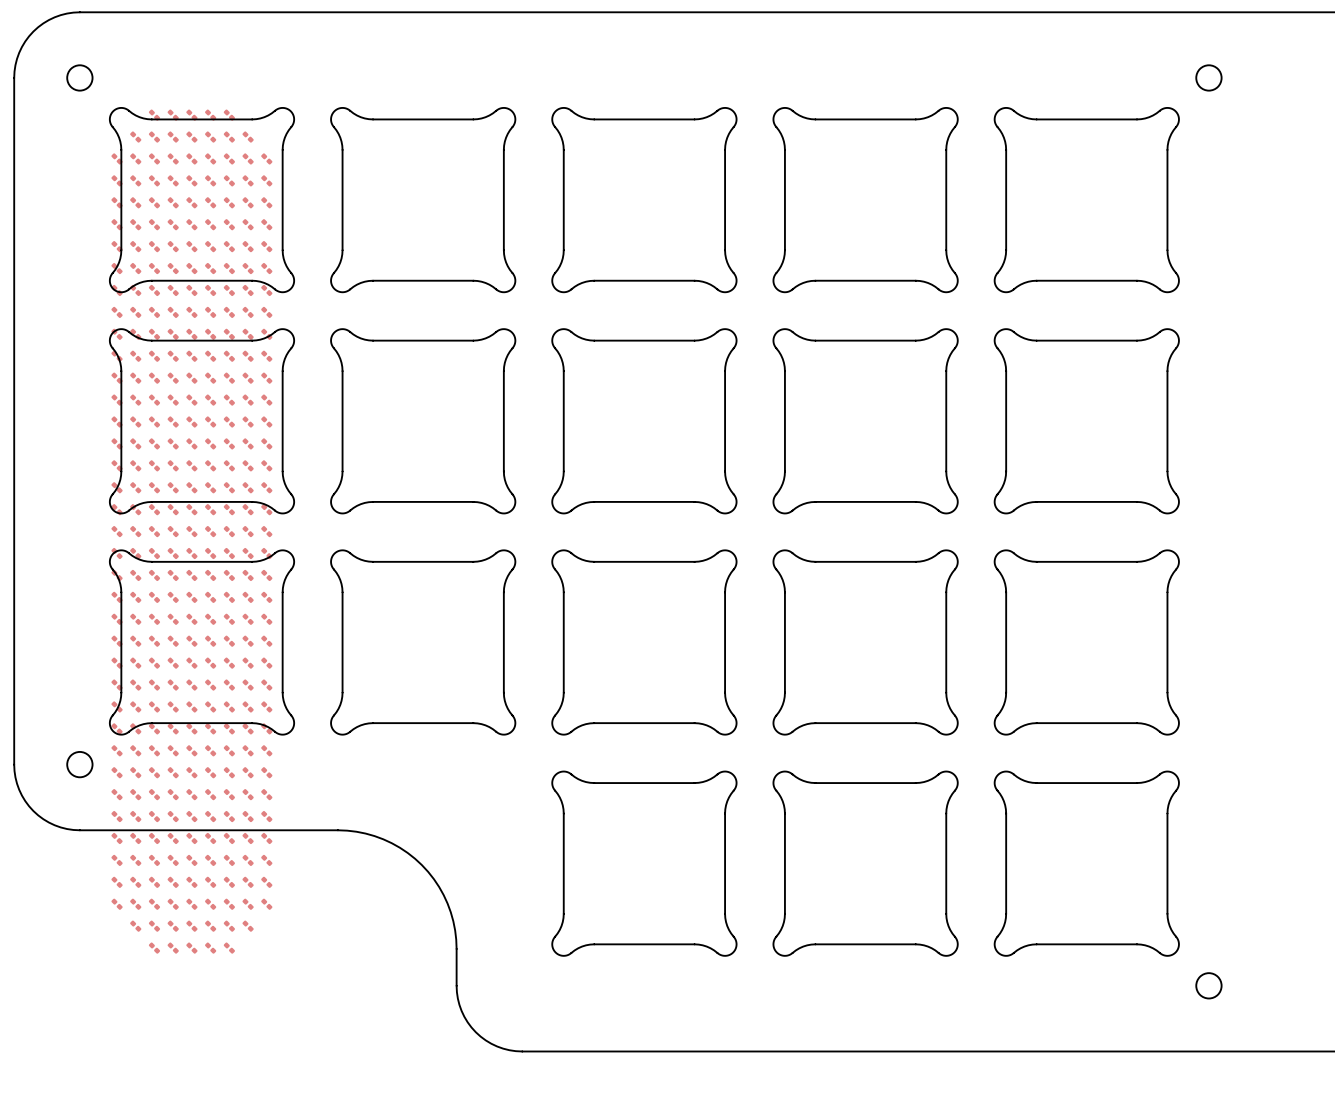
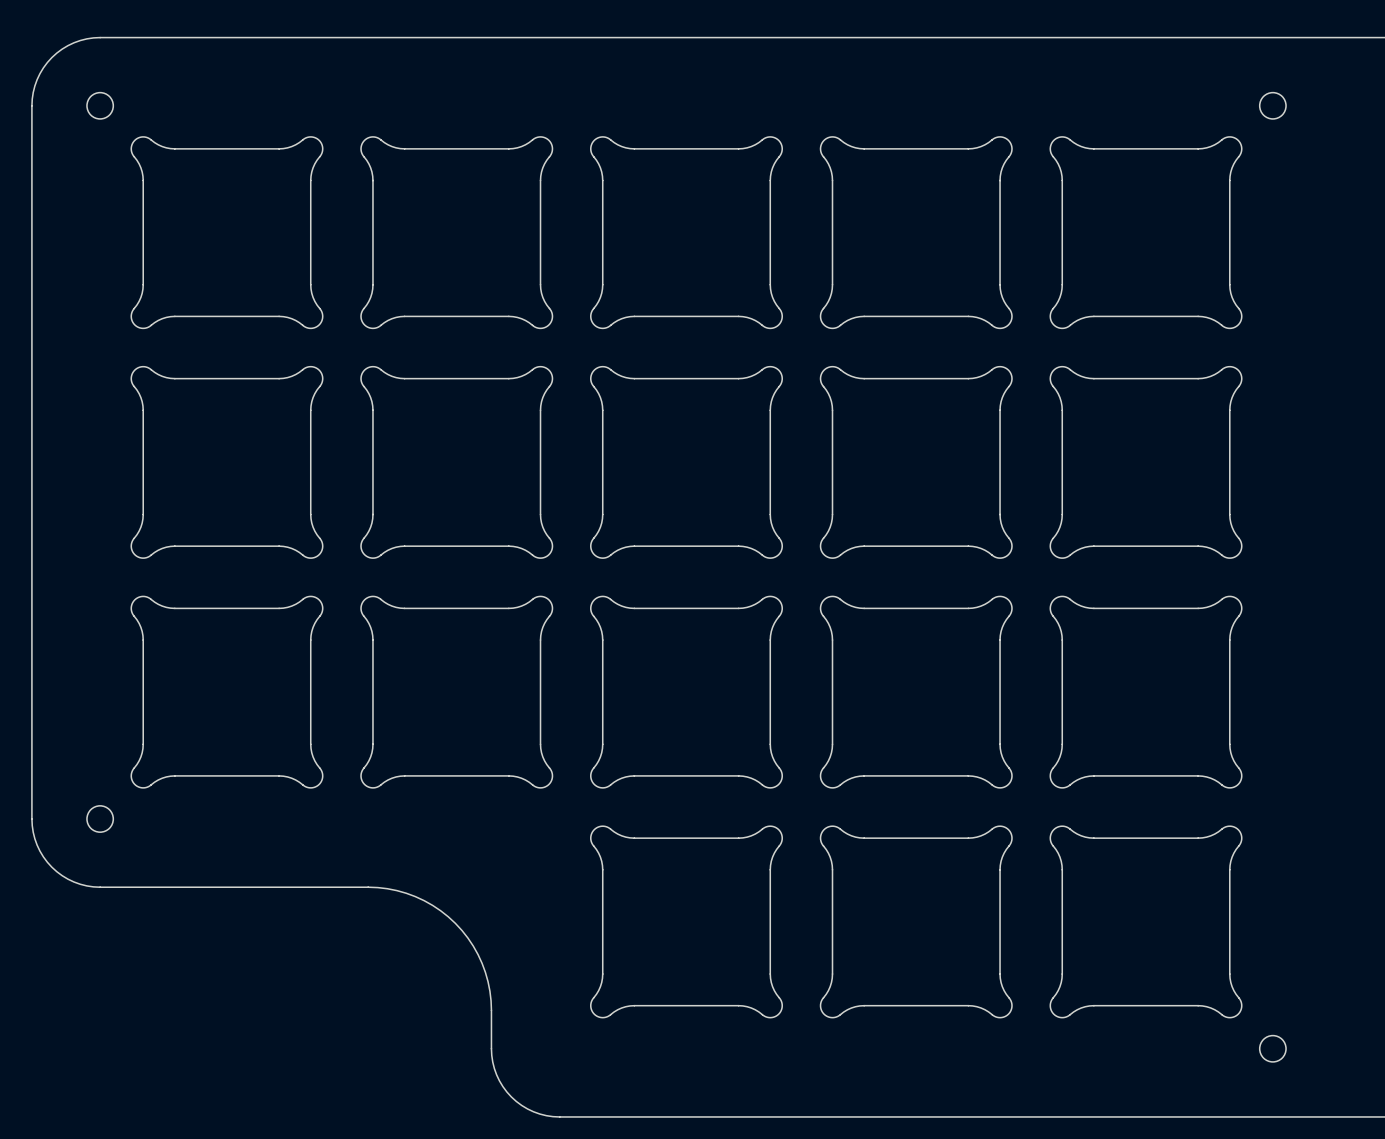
part: (154, 115) -> none
part: (173, 115) -> none
part: (191, 115) -> none
part: (210, 115) -> none
part: (229, 115) -> none
part: (135, 137) -> none
part: (154, 137) -> none
part: (173, 137) -> none
part: (191, 137) -> none
part: (210, 137) -> none
part: (229, 137) -> none
part: (248, 137) -> none
part: (117, 158) -> none
part: (135, 158) -> none
part: (154, 158) -> none
part: (173, 158) -> none
part: (191, 158) -> none
part: (210, 158) -> none
part: (229, 158) -> none
part: (248, 158) -> none
part: (266, 158) -> none
part: (117, 180) -> none
part: (135, 180) -> none
part: (154, 180) -> none
part: (173, 180) -> none
part: (191, 180) -> none
part: (210, 180) -> none
part: (229, 180) -> none
part: (248, 180) -> none
part: (266, 180) -> none
part: (117, 202) -> none
part: (135, 202) -> none
part: (154, 202) -> none
part: (173, 202) -> none
part: (191, 202) -> none
part: (210, 202) -> none
part: (229, 202) -> none
part: (248, 202) -> none
part: (266, 202) -> none
part: (117, 224) -> none
part: (135, 224) -> none
part: (154, 224) -> none
part: (173, 224) -> none
part: (191, 224) -> none
part: (210, 224) -> none
part: (229, 224) -> none
part: (248, 224) -> none
part: (266, 224) -> none
part: (117, 246) -> none
part: (135, 246) -> none
part: (154, 246) -> none
part: (173, 246) -> none
part: (191, 246) -> none
part: (210, 246) -> none
part: (229, 246) -> none
part: (248, 246) -> none
part: (266, 246) -> none
part: (117, 268) -> none
part: (135, 268) -> none
part: (154, 268) -> none
part: (173, 268) -> none
part: (191, 268) -> none
part: (210, 268) -> none
part: (229, 268) -> none
part: (248, 268) -> none
part: (266, 268) -> none
part: (117, 290) -> none
part: (135, 290) -> none
part: (154, 290) -> none
part: (173, 290) -> none
part: (191, 290) -> none
part: (210, 290) -> none
part: (229, 290) -> none
part: (248, 290) -> none
part: (266, 290) -> none
part: (117, 312) -> none
part: (135, 312) -> none
part: (154, 312) -> none
part: (173, 312) -> none
part: (191, 312) -> none
part: (210, 312) -> none
part: (229, 312) -> none
part: (248, 312) -> none
part: (266, 312) -> none
part: (117, 334) -> none
part: (135, 334) -> none
part: (154, 334) -> none
part: (173, 334) -> none
part: (191, 334) -> none
part: (210, 334) -> none
part: (229, 334) -> none
part: (248, 334) -> none
part: (266, 334) -> none
part: (117, 356) -> none
part: (135, 356) -> none
part: (154, 356) -> none
part: (173, 356) -> none
part: (191, 356) -> none
part: (210, 356) -> none
part: (229, 356) -> none
part: (248, 356) -> none
part: (266, 356) -> none
part: (117, 378) -> none
part: (135, 378) -> none
part: (154, 378) -> none
part: (173, 378) -> none
part: (191, 378) -> none
part: (210, 378) -> none
part: (229, 378) -> none
part: (248, 378) -> none
part: (266, 378) -> none
part: (117, 400) -> none
part: (135, 400) -> none
part: (154, 400) -> none
part: (173, 400) -> none
part: (191, 400) -> none
part: (210, 400) -> none
part: (229, 400) -> none
part: (248, 400) -> none
part: (266, 400) -> none
part: (117, 422) -> none
part: (135, 422) -> none
part: (154, 422) -> none
part: (173, 422) -> none
part: (191, 422) -> none
part: (210, 422) -> none
part: (229, 422) -> none
part: (248, 422) -> none
part: (266, 422) -> none
part: (117, 443) -> none
part: (135, 443) -> none
part: (154, 443) -> none
part: (173, 443) -> none
part: (191, 443) -> none
part: (210, 443) -> none
part: (229, 443) -> none
part: (248, 443) -> none
part: (266, 443) -> none
part: (117, 465) -> none
part: (135, 465) -> none
part: (154, 465) -> none
part: (173, 465) -> none
part: (191, 465) -> none
part: (210, 465) -> none
part: (229, 465) -> none
part: (248, 465) -> none
part: (266, 465) -> none
part: (117, 487) -> none
part: (135, 487) -> none
part: (154, 487) -> none
part: (173, 487) -> none
part: (191, 487) -> none
part: (210, 487) -> none
part: (229, 487) -> none
part: (248, 487) -> none
part: (266, 487) -> none
part: (117, 509) -> none
part: (135, 509) -> none
part: (154, 509) -> none
part: (173, 509) -> none
part: (191, 509) -> none
part: (210, 509) -> none
part: (229, 509) -> none
part: (248, 509) -> none
part: (266, 509) -> none
part: (117, 531) -> none
part: (135, 531) -> none
part: (154, 531) -> none
part: (173, 531) -> none
part: (191, 531) -> none
part: (210, 531) -> none
part: (229, 531) -> none
part: (248, 531) -> none
part: (266, 531) -> none
part: (117, 553) -> none
part: (135, 553) -> none
part: (154, 553) -> none
part: (173, 553) -> none
part: (191, 553) -> none
part: (210, 553) -> none
part: (229, 553) -> none
part: (248, 553) -> none
part: (266, 553) -> none
part: (117, 575) -> none
part: (135, 575) -> none
part: (154, 575) -> none
part: (173, 575) -> none
part: (191, 575) -> none
part: (210, 575) -> none
part: (229, 575) -> none
part: (248, 575) -> none
part: (266, 575) -> none
part: (117, 597) -> none
part: (135, 597) -> none
part: (154, 597) -> none
part: (173, 597) -> none
part: (191, 597) -> none
part: (210, 597) -> none
part: (229, 597) -> none
part: (248, 597) -> none
part: (266, 597) -> none
part: (117, 619) -> none
part: (135, 619) -> none
part: (154, 619) -> none
part: (173, 619) -> none
part: (191, 619) -> none
part: (210, 619) -> none
part: (229, 619) -> none
part: (248, 619) -> none
part: (266, 619) -> none
part: (117, 641) -> none
part: (135, 641) -> none
part: (154, 641) -> none
part: (173, 641) -> none
part: (191, 641) -> none
part: (210, 641) -> none
part: (229, 641) -> none
part: (248, 641) -> none
part: (266, 641) -> none
part: (117, 663) -> none
part: (135, 663) -> none
part: (154, 663) -> none
part: (173, 663) -> none
part: (191, 663) -> none
part: (210, 663) -> none
part: (229, 663) -> none
part: (248, 663) -> none
part: (266, 663) -> none
part: (117, 685) -> none
part: (135, 685) -> none
part: (154, 685) -> none
part: (173, 685) -> none
part: (191, 685) -> none
part: (210, 685) -> none
part: (229, 685) -> none
part: (248, 685) -> none
part: (266, 685) -> none
part: (117, 706) -> none
part: (135, 706) -> none
part: (154, 706) -> none
part: (173, 706) -> none
part: (191, 706) -> none
part: (210, 706) -> none
part: (229, 706) -> none
part: (248, 706) -> none
part: (266, 706) -> none
part: (117, 728) -> none
part: (135, 728) -> none
part: (154, 728) -> none
part: (173, 728) -> none
part: (191, 728) -> none
part: (210, 728) -> none
part: (229, 728) -> none
part: (248, 728) -> none
part: (266, 728) -> none
part: (117, 750) -> none
part: (135, 750) -> none
part: (154, 750) -> none
part: (173, 750) -> none
part: (191, 750) -> none
part: (210, 750) -> none
part: (229, 750) -> none
part: (248, 750) -> none
part: (266, 750) -> none
part: (117, 772) -> none
part: (135, 772) -> none
part: (154, 772) -> none
part: (173, 772) -> none
part: (191, 772) -> none
part: (210, 772) -> none
part: (229, 772) -> none
part: (248, 772) -> none
part: (266, 772) -> none
part: (117, 794) -> none
part: (135, 794) -> none
part: (154, 794) -> none
part: (173, 794) -> none
part: (191, 794) -> none
part: (210, 794) -> none
part: (229, 794) -> none
part: (248, 794) -> none
part: (266, 794) -> none
part: (117, 816) -> none
part: (135, 816) -> none
part: (154, 816) -> none
part: (173, 816) -> none
part: (191, 816) -> none
part: (210, 816) -> none
part: (229, 816) -> none
part: (248, 816) -> none
part: (266, 816) -> none
part: (117, 838) -> none
part: (135, 838) -> none
part: (154, 838) -> none
part: (173, 838) -> none
part: (191, 838) -> none
part: (210, 838) -> none
part: (229, 838) -> none
part: (248, 838) -> none
part: (266, 838) -> none
part: (117, 860) -> none
part: (135, 860) -> none
part: (154, 860) -> none
part: (173, 860) -> none
part: (191, 860) -> none
part: (210, 860) -> none
part: (229, 860) -> none
part: (248, 860) -> none
part: (266, 860) -> none
part: (117, 882) -> none
part: (135, 882) -> none
part: (154, 882) -> none
part: (173, 882) -> none
part: (191, 882) -> none
part: (210, 882) -> none
part: (229, 882) -> none
part: (248, 882) -> none
part: (266, 882) -> none
part: (117, 904) -> none
part: (135, 904) -> none
part: (154, 904) -> none
part: (173, 904) -> none
part: (191, 904) -> none
part: (210, 904) -> none
part: (229, 904) -> none
part: (248, 904) -> none
part: (266, 904) -> none
part: (135, 926) -> none
part: (154, 926) -> none
part: (173, 926) -> none
part: (191, 926) -> none
part: (210, 926) -> none
part: (229, 926) -> none
part: (248, 926) -> none
part: (154, 948) -> none
part: (173, 948) -> none
part: (191, 948) -> none
part: (210, 948) -> none
part: (229, 948) -> none

